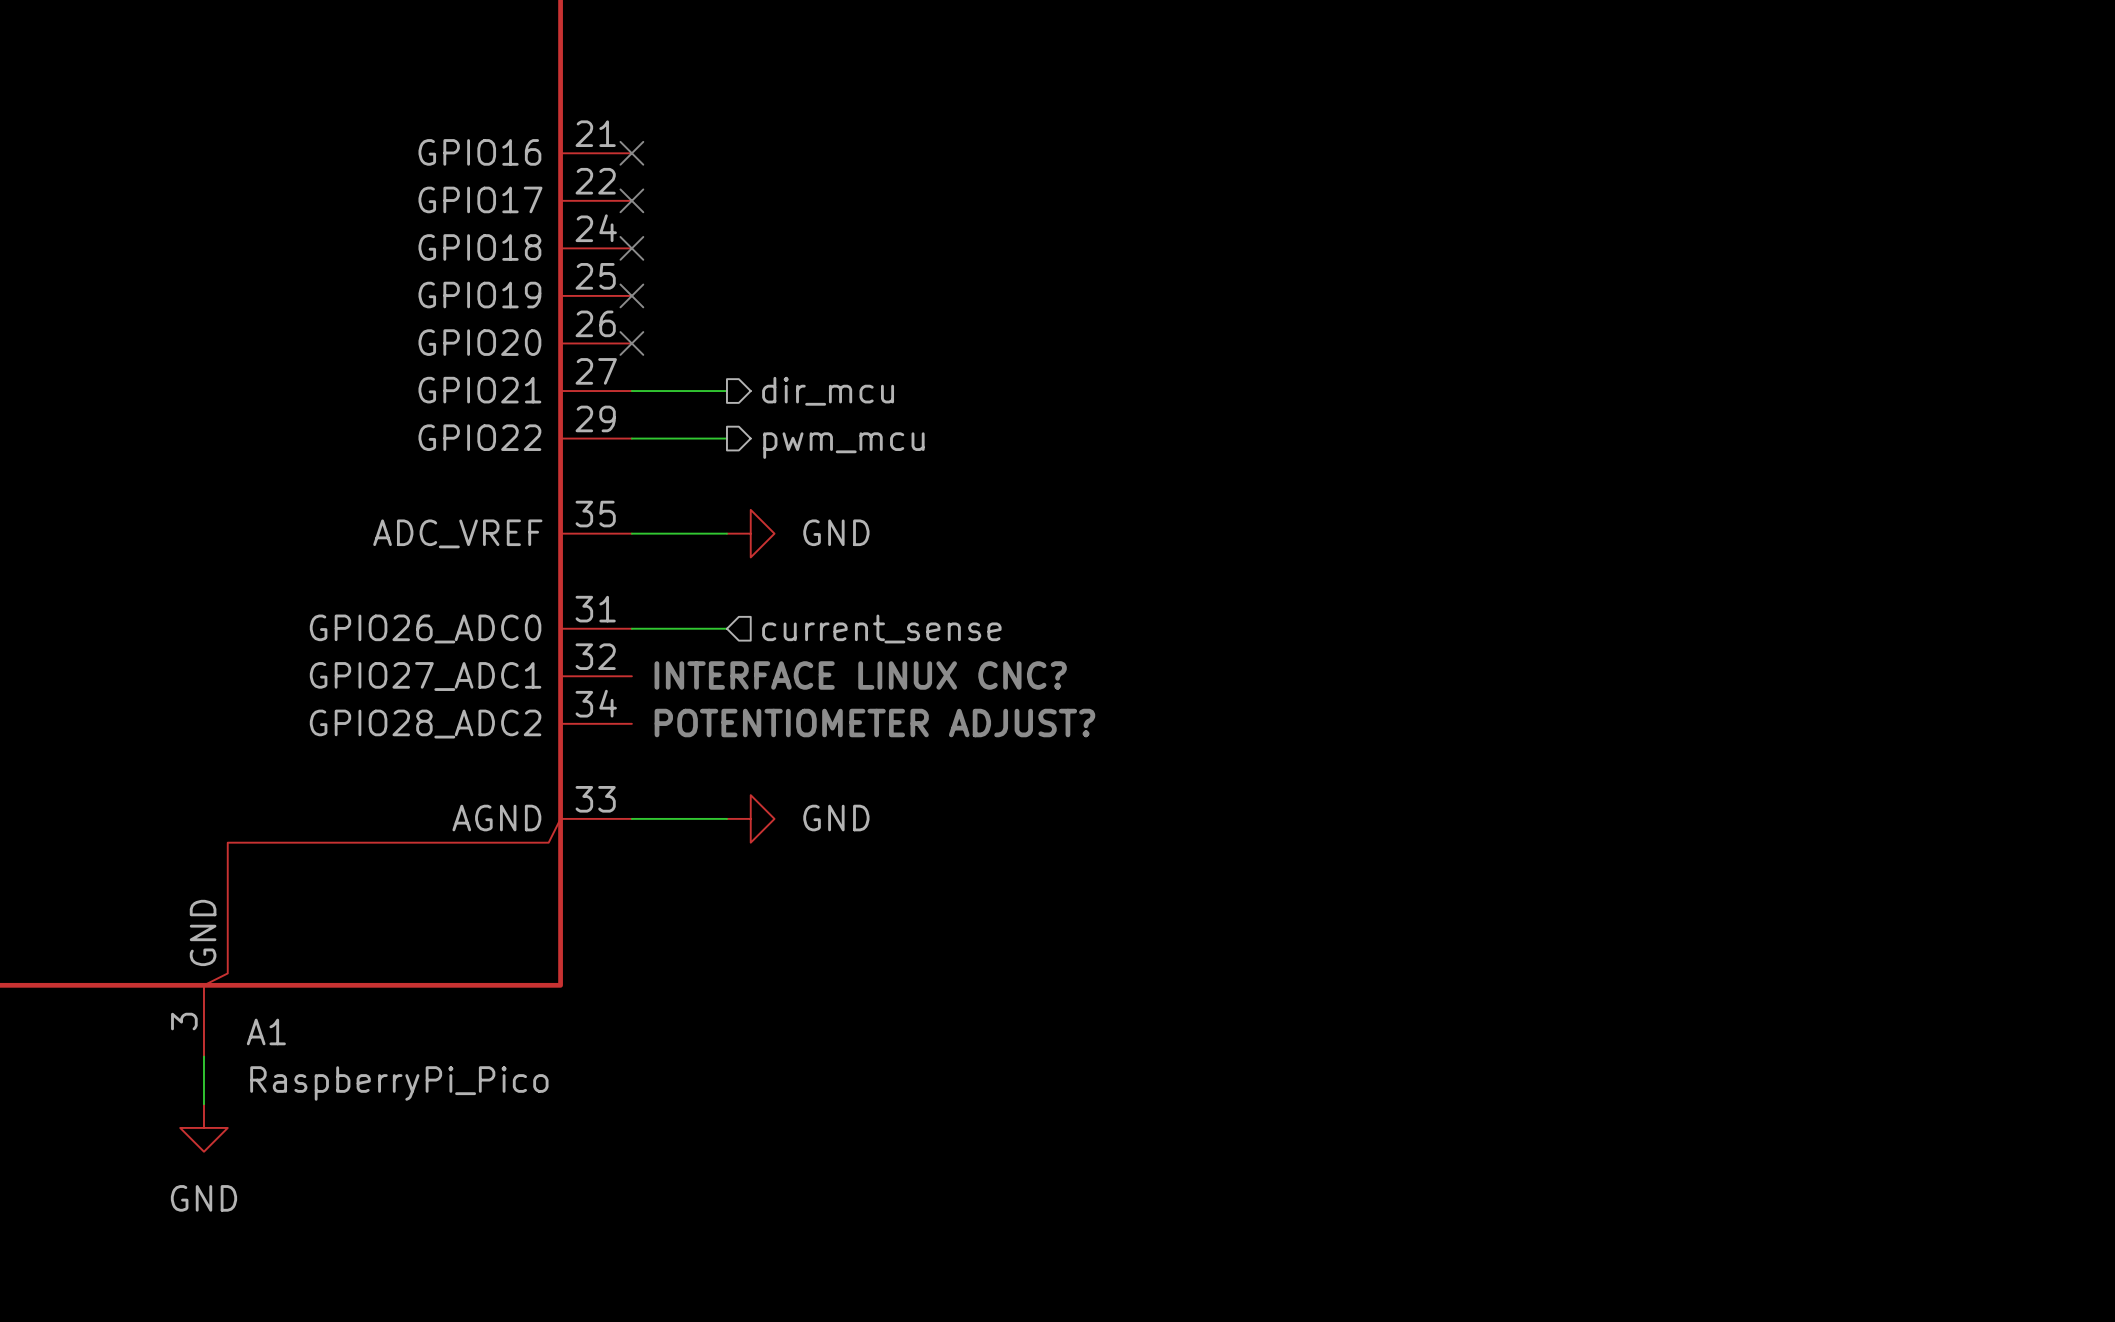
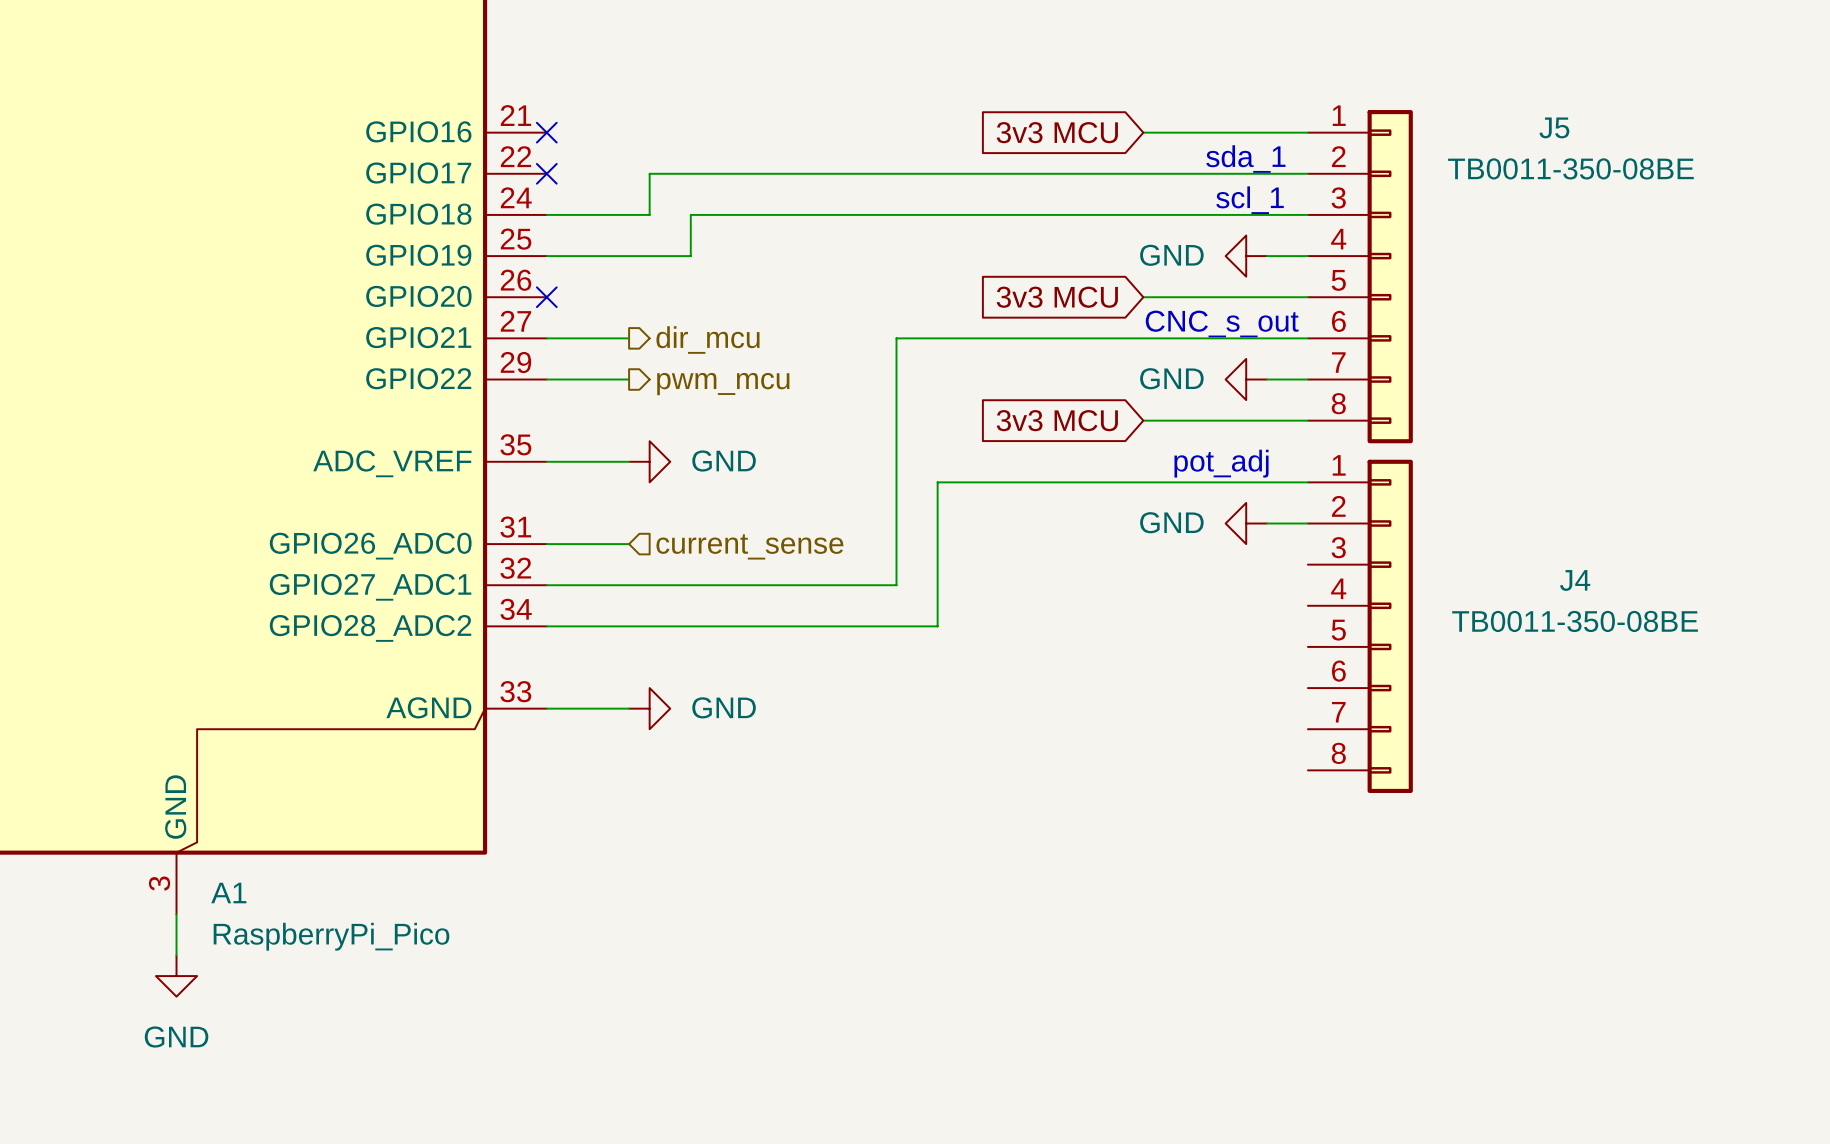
global label: none -> 3v3 MCU (1057, 132)
wire: none -> (1143, 132) (1307, 132)
text: none -> sda_1 (1245, 159)
wire: none -> (1307, 173) (649, 173) (649, 214) (546, 214)
text: none -> scl_1 (1250, 200)
no-connect mark: (631, 248) -> none
wire: none -> (1307, 214) (690, 214) (690, 256) (546, 256)
no-connect mark: (631, 295) -> none
power symbol: none -> GND (1246, 256)
wire: none -> (1266, 256) (1307, 256)
J5: none -> TB0011-350-08BE (1360, 276)
global label: none -> 3v3 MCU (1057, 297)
wire: none -> (1143, 297) (1307, 297)
text: none -> CNC_s_out (1222, 324)
wire: none -> (1307, 338) (896, 338) (896, 585) (546, 585)
power symbol: none -> GND (1246, 379)
wire: none -> (1266, 379) (1307, 379)
global label: none -> 3v3 MCU (1057, 420)
wire: none -> (1143, 420) (1307, 420)
text: none -> pot_adj (1221, 463)
wire: none -> (1307, 482) (937, 482) (937, 626) (546, 626)
power symbol: none -> GND (1246, 523)
wire: none -> (1266, 523) (1307, 523)
text: INTERFACE LINUX CNC? (860, 675) -> none
text: POTENTIOMETER ADJUST? (874, 723) -> none
J4: none -> TB0011-350-08BE (1360, 626)

